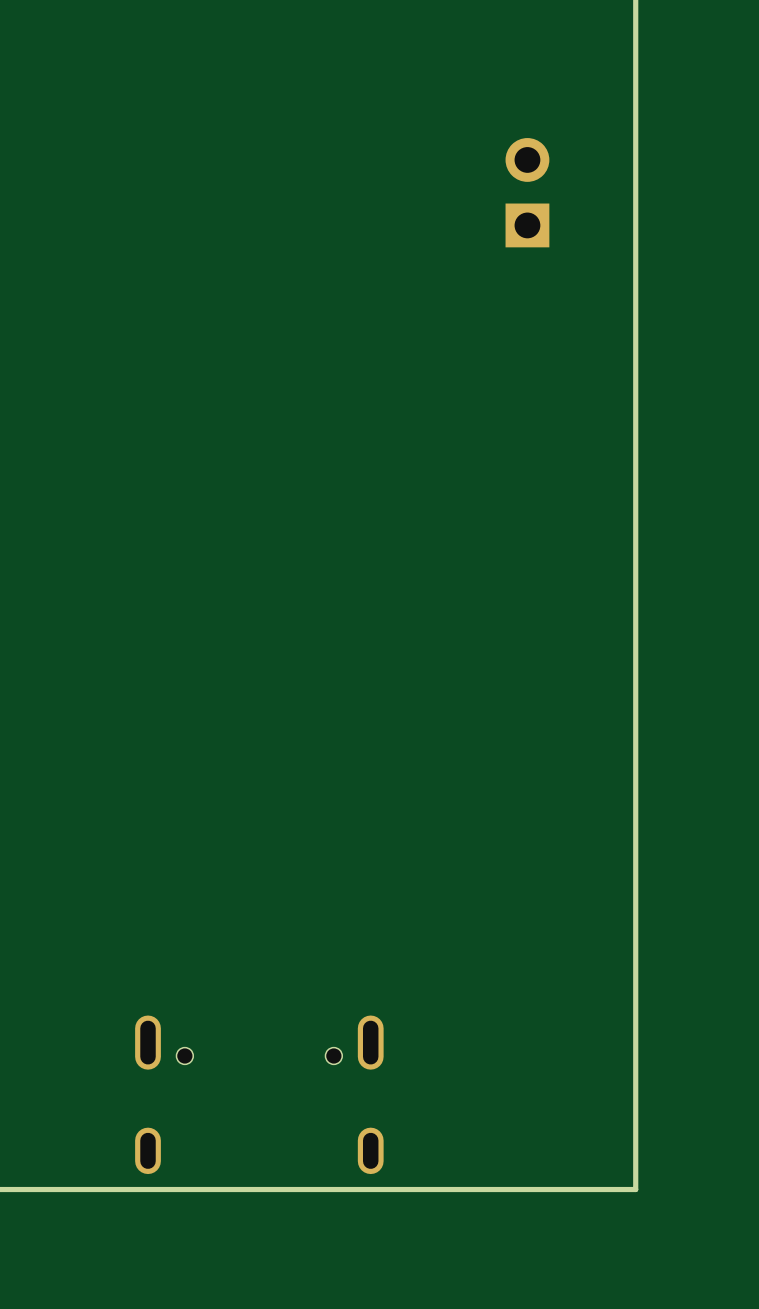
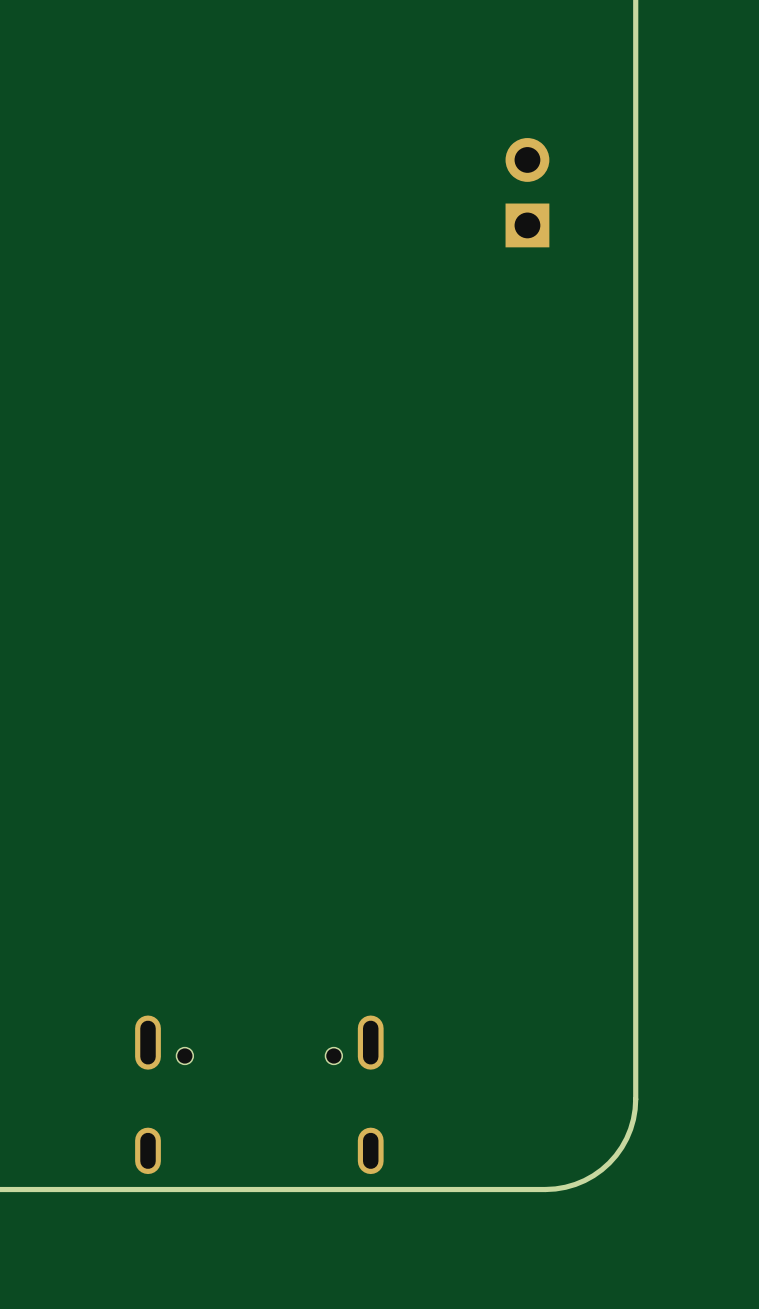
board edge: (635, 1099) (635, 1189) (545, 1189) -> (635, 1099) (633, 1119) (626, 1138) (609, 1163) (584, 1180) (565, 1187) (545, 1189)

